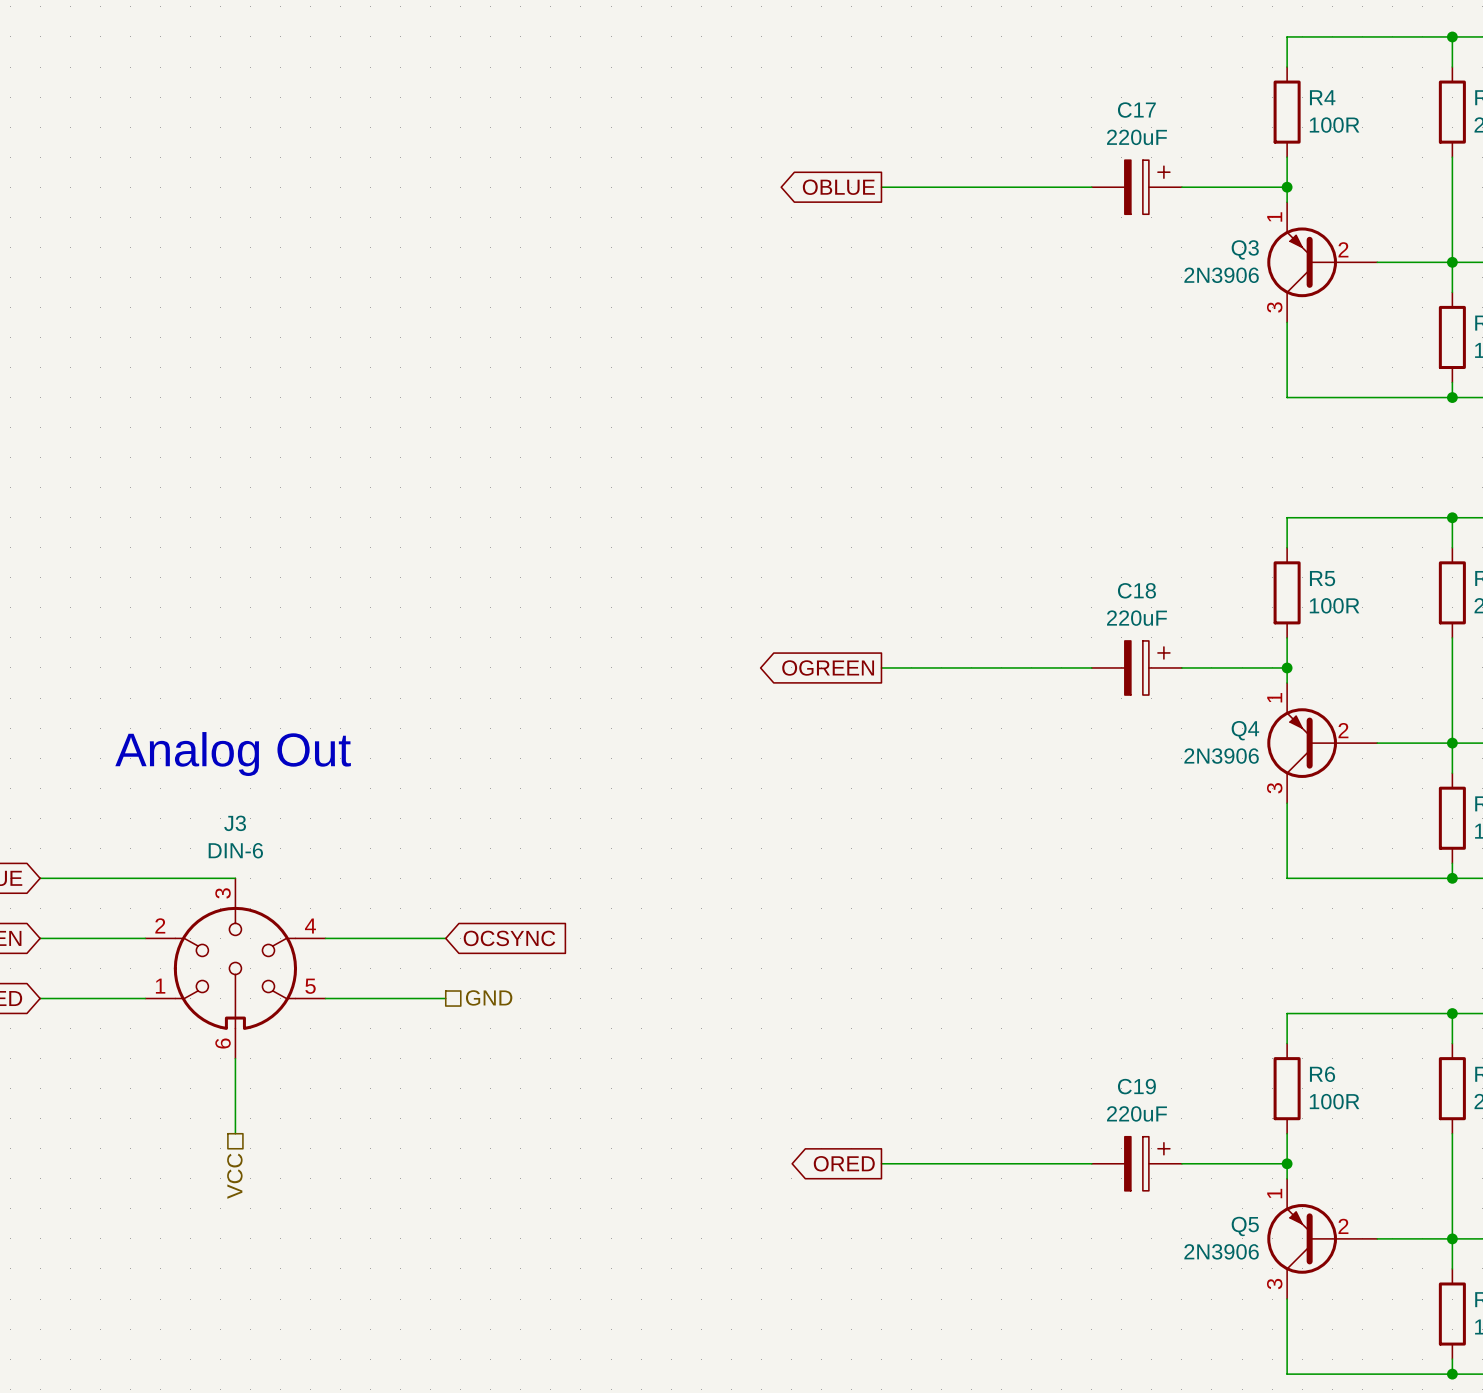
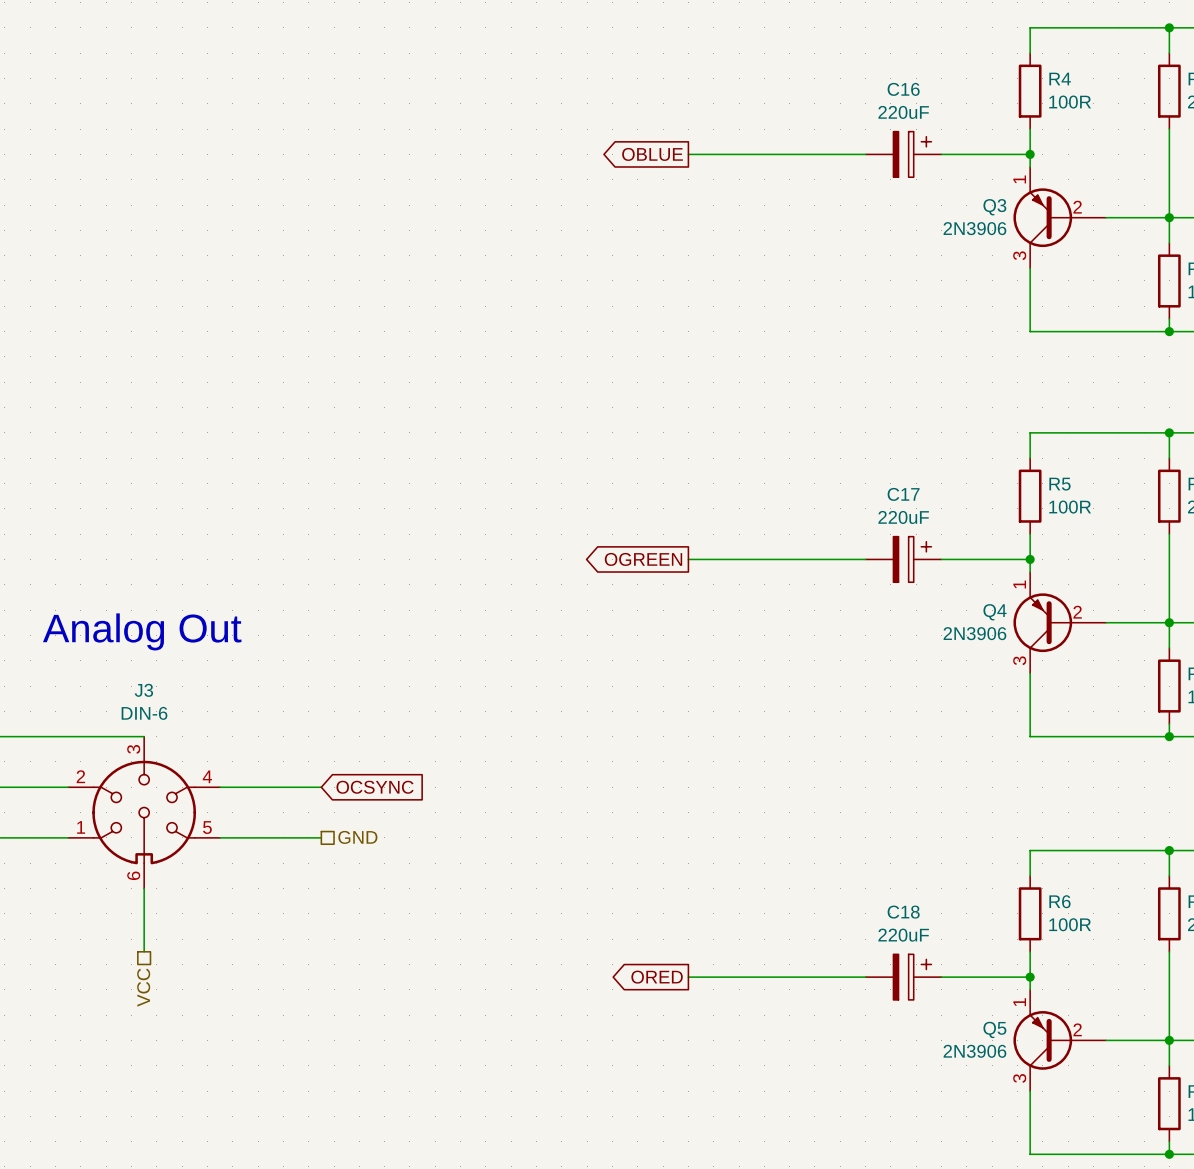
C17 name: C17 (1136, 110) -> C16 (903, 89)
C18 name: C18 (1136, 590) -> C17 (903, 494)
C19 name: C19 (1136, 1086) -> C18 (903, 912)

